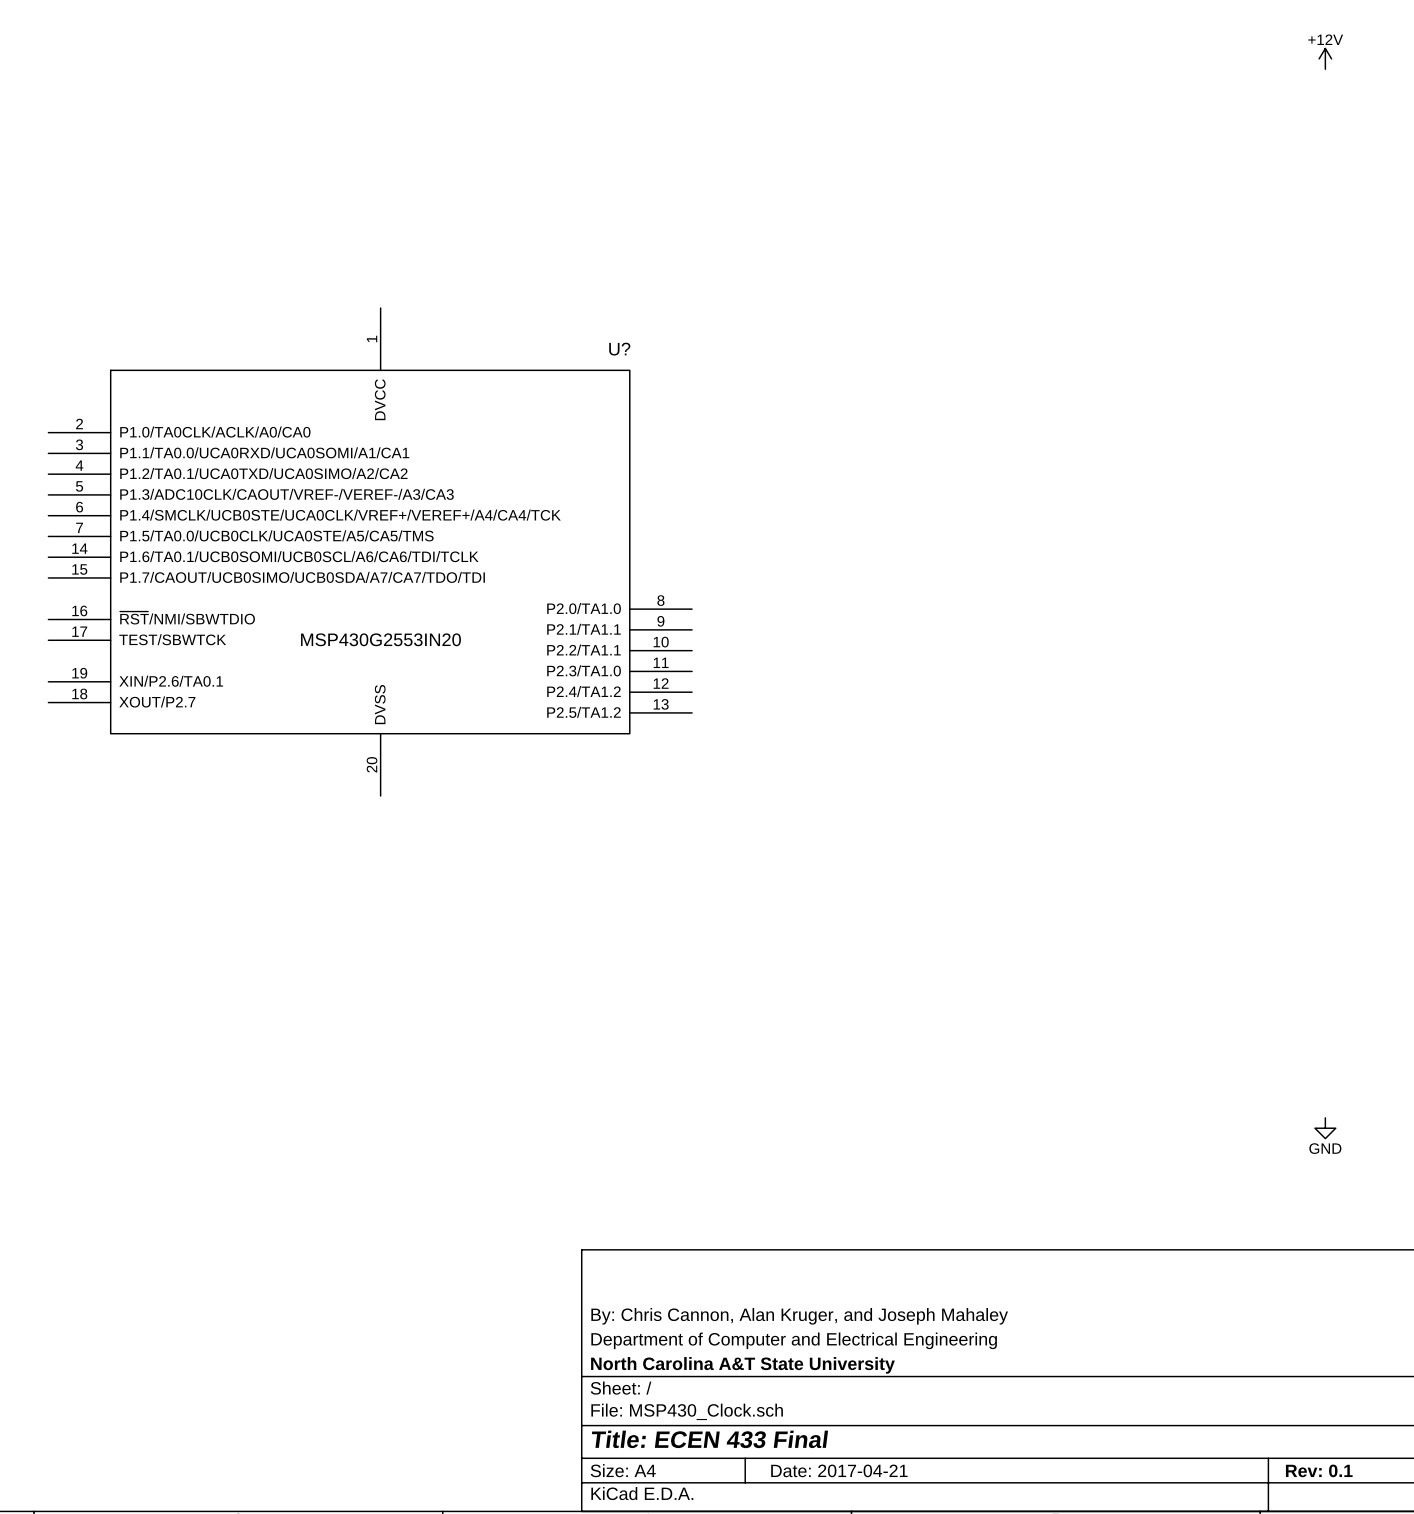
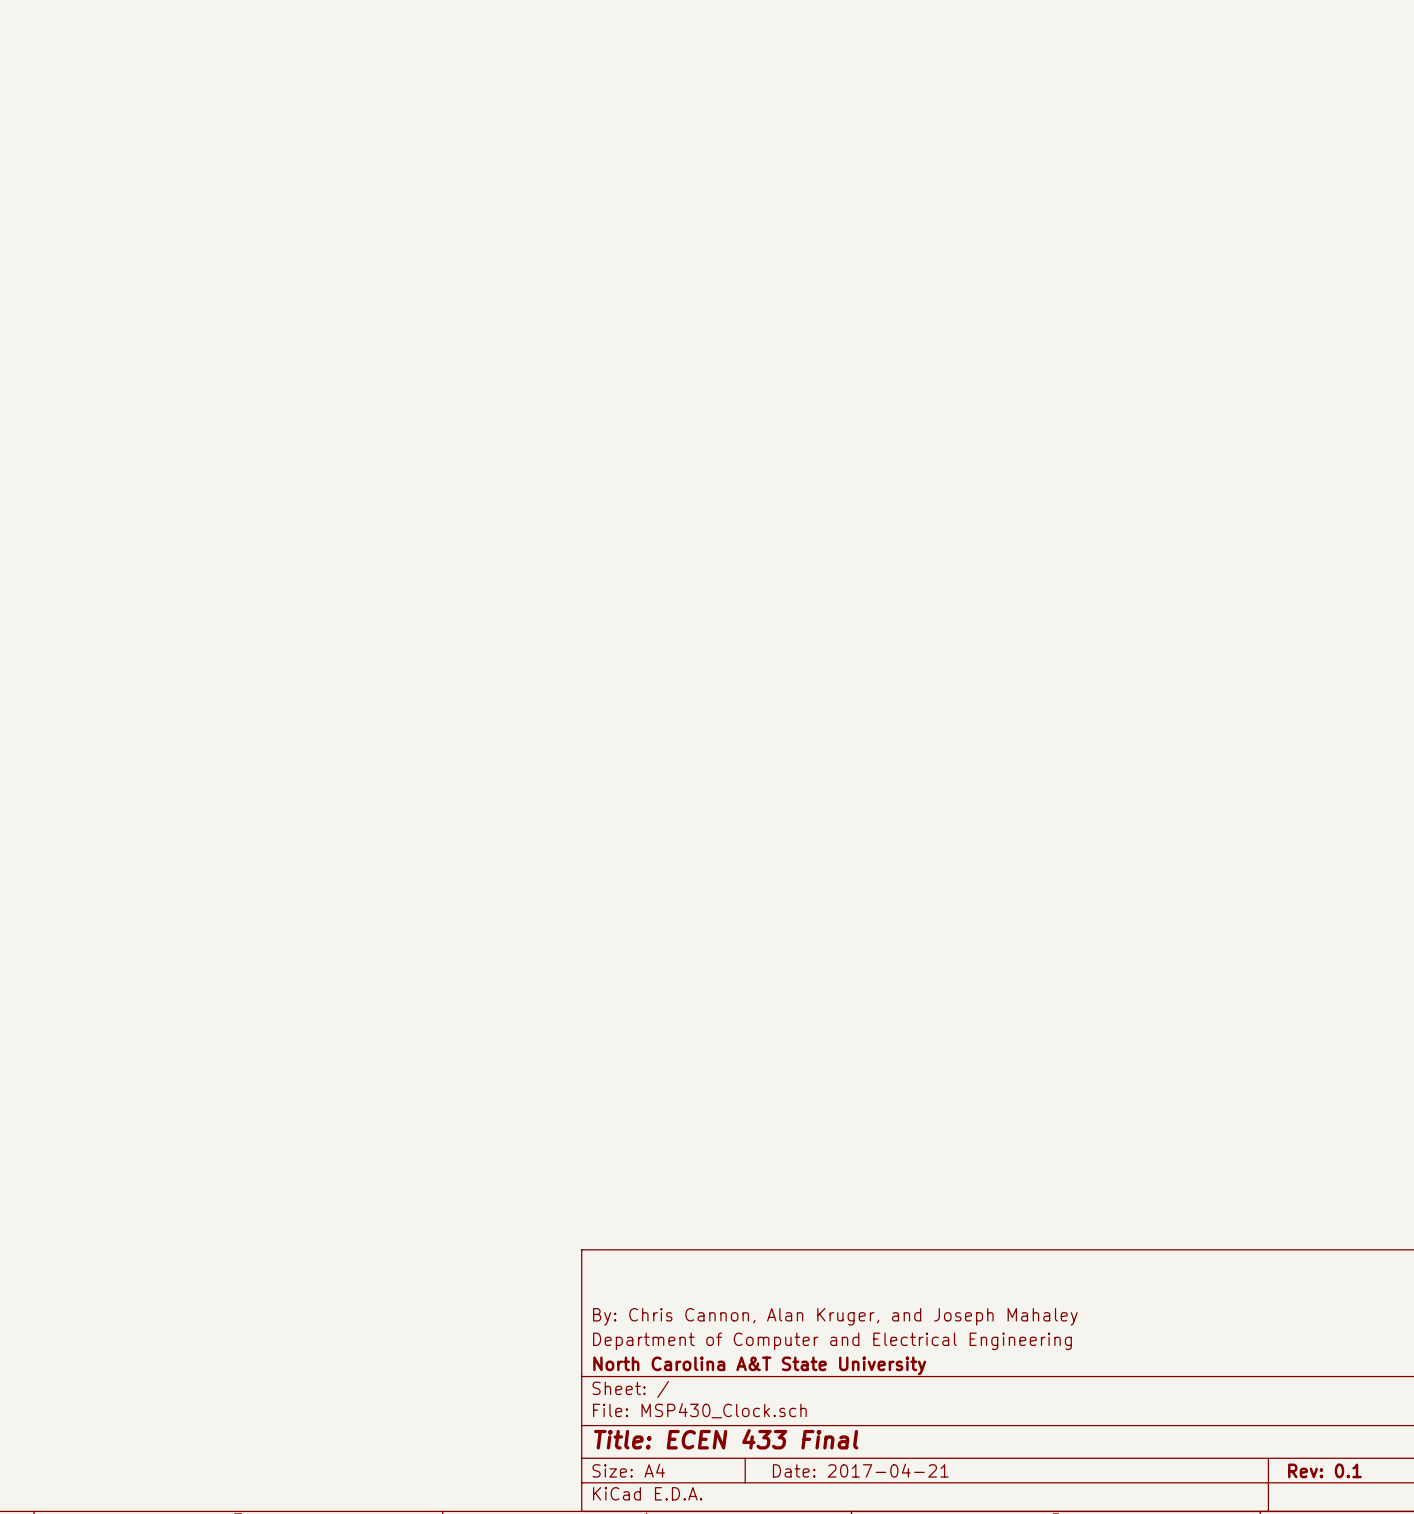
power symbol: +12V (1325, 58) -> none
U?: MSP430G2553IN20 (370, 552) -> none
power symbol: GND (1325, 1128) -> none

